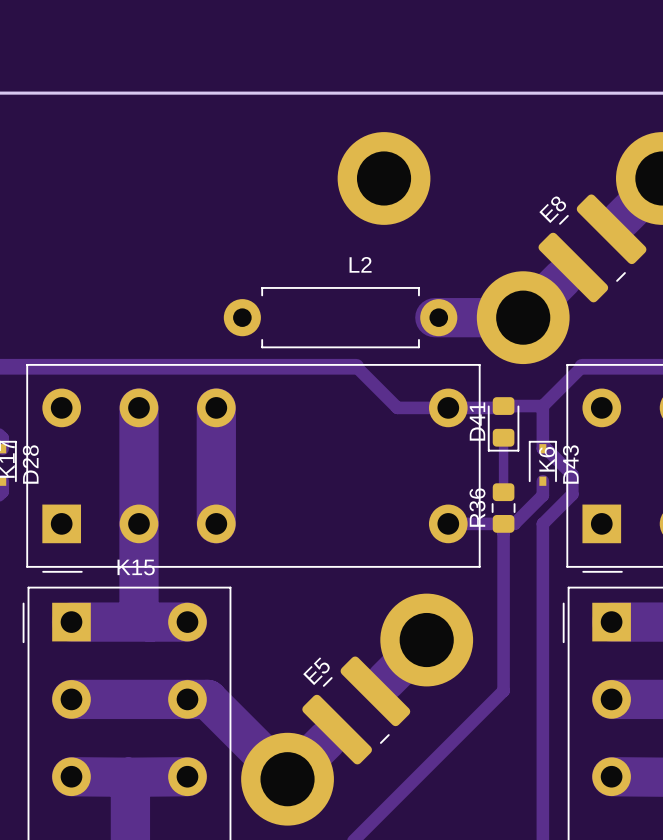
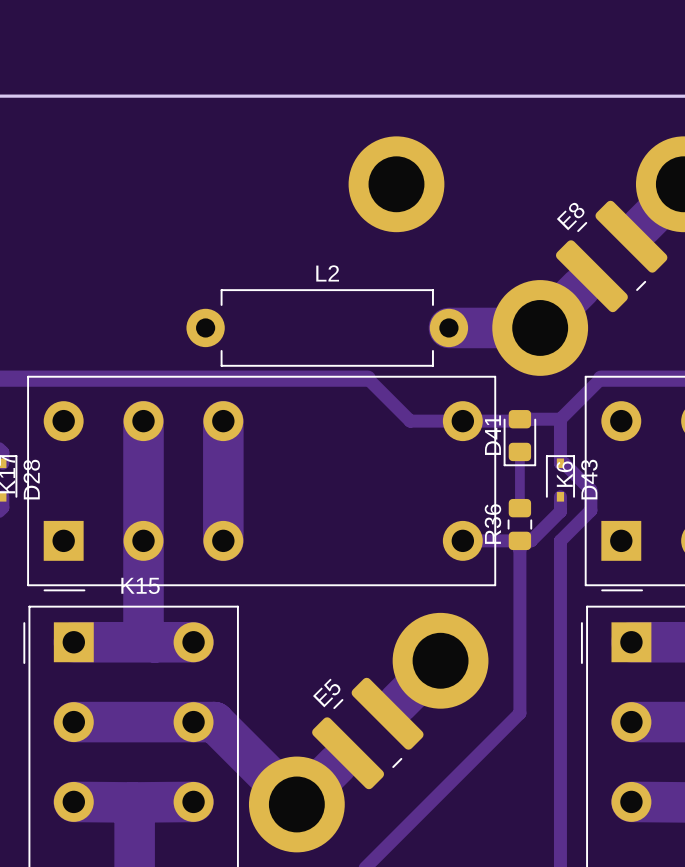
L2 footprint: [223, 287, 458, 349] -> [186, 289, 469, 367]

